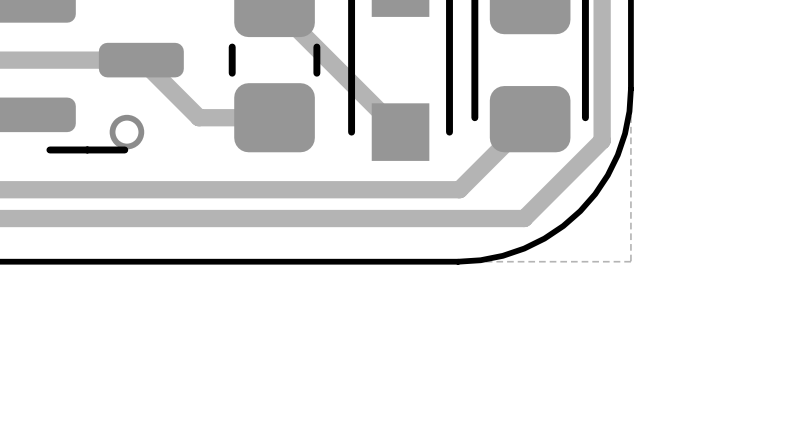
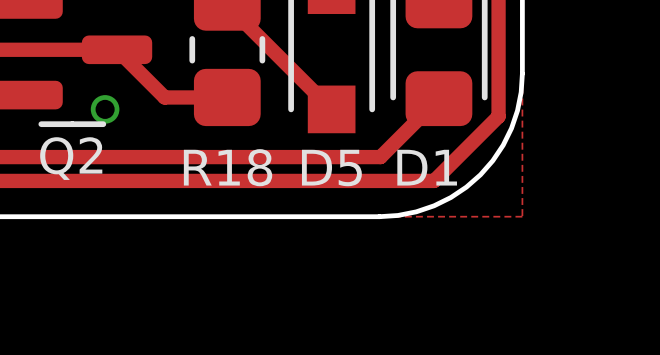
Q2 name: none -> Q2 (71, 158)
R18 name: none -> R18 (228, 167)
D5 name: none -> D5 (331, 168)
D1 name: none -> D1 (427, 167)

